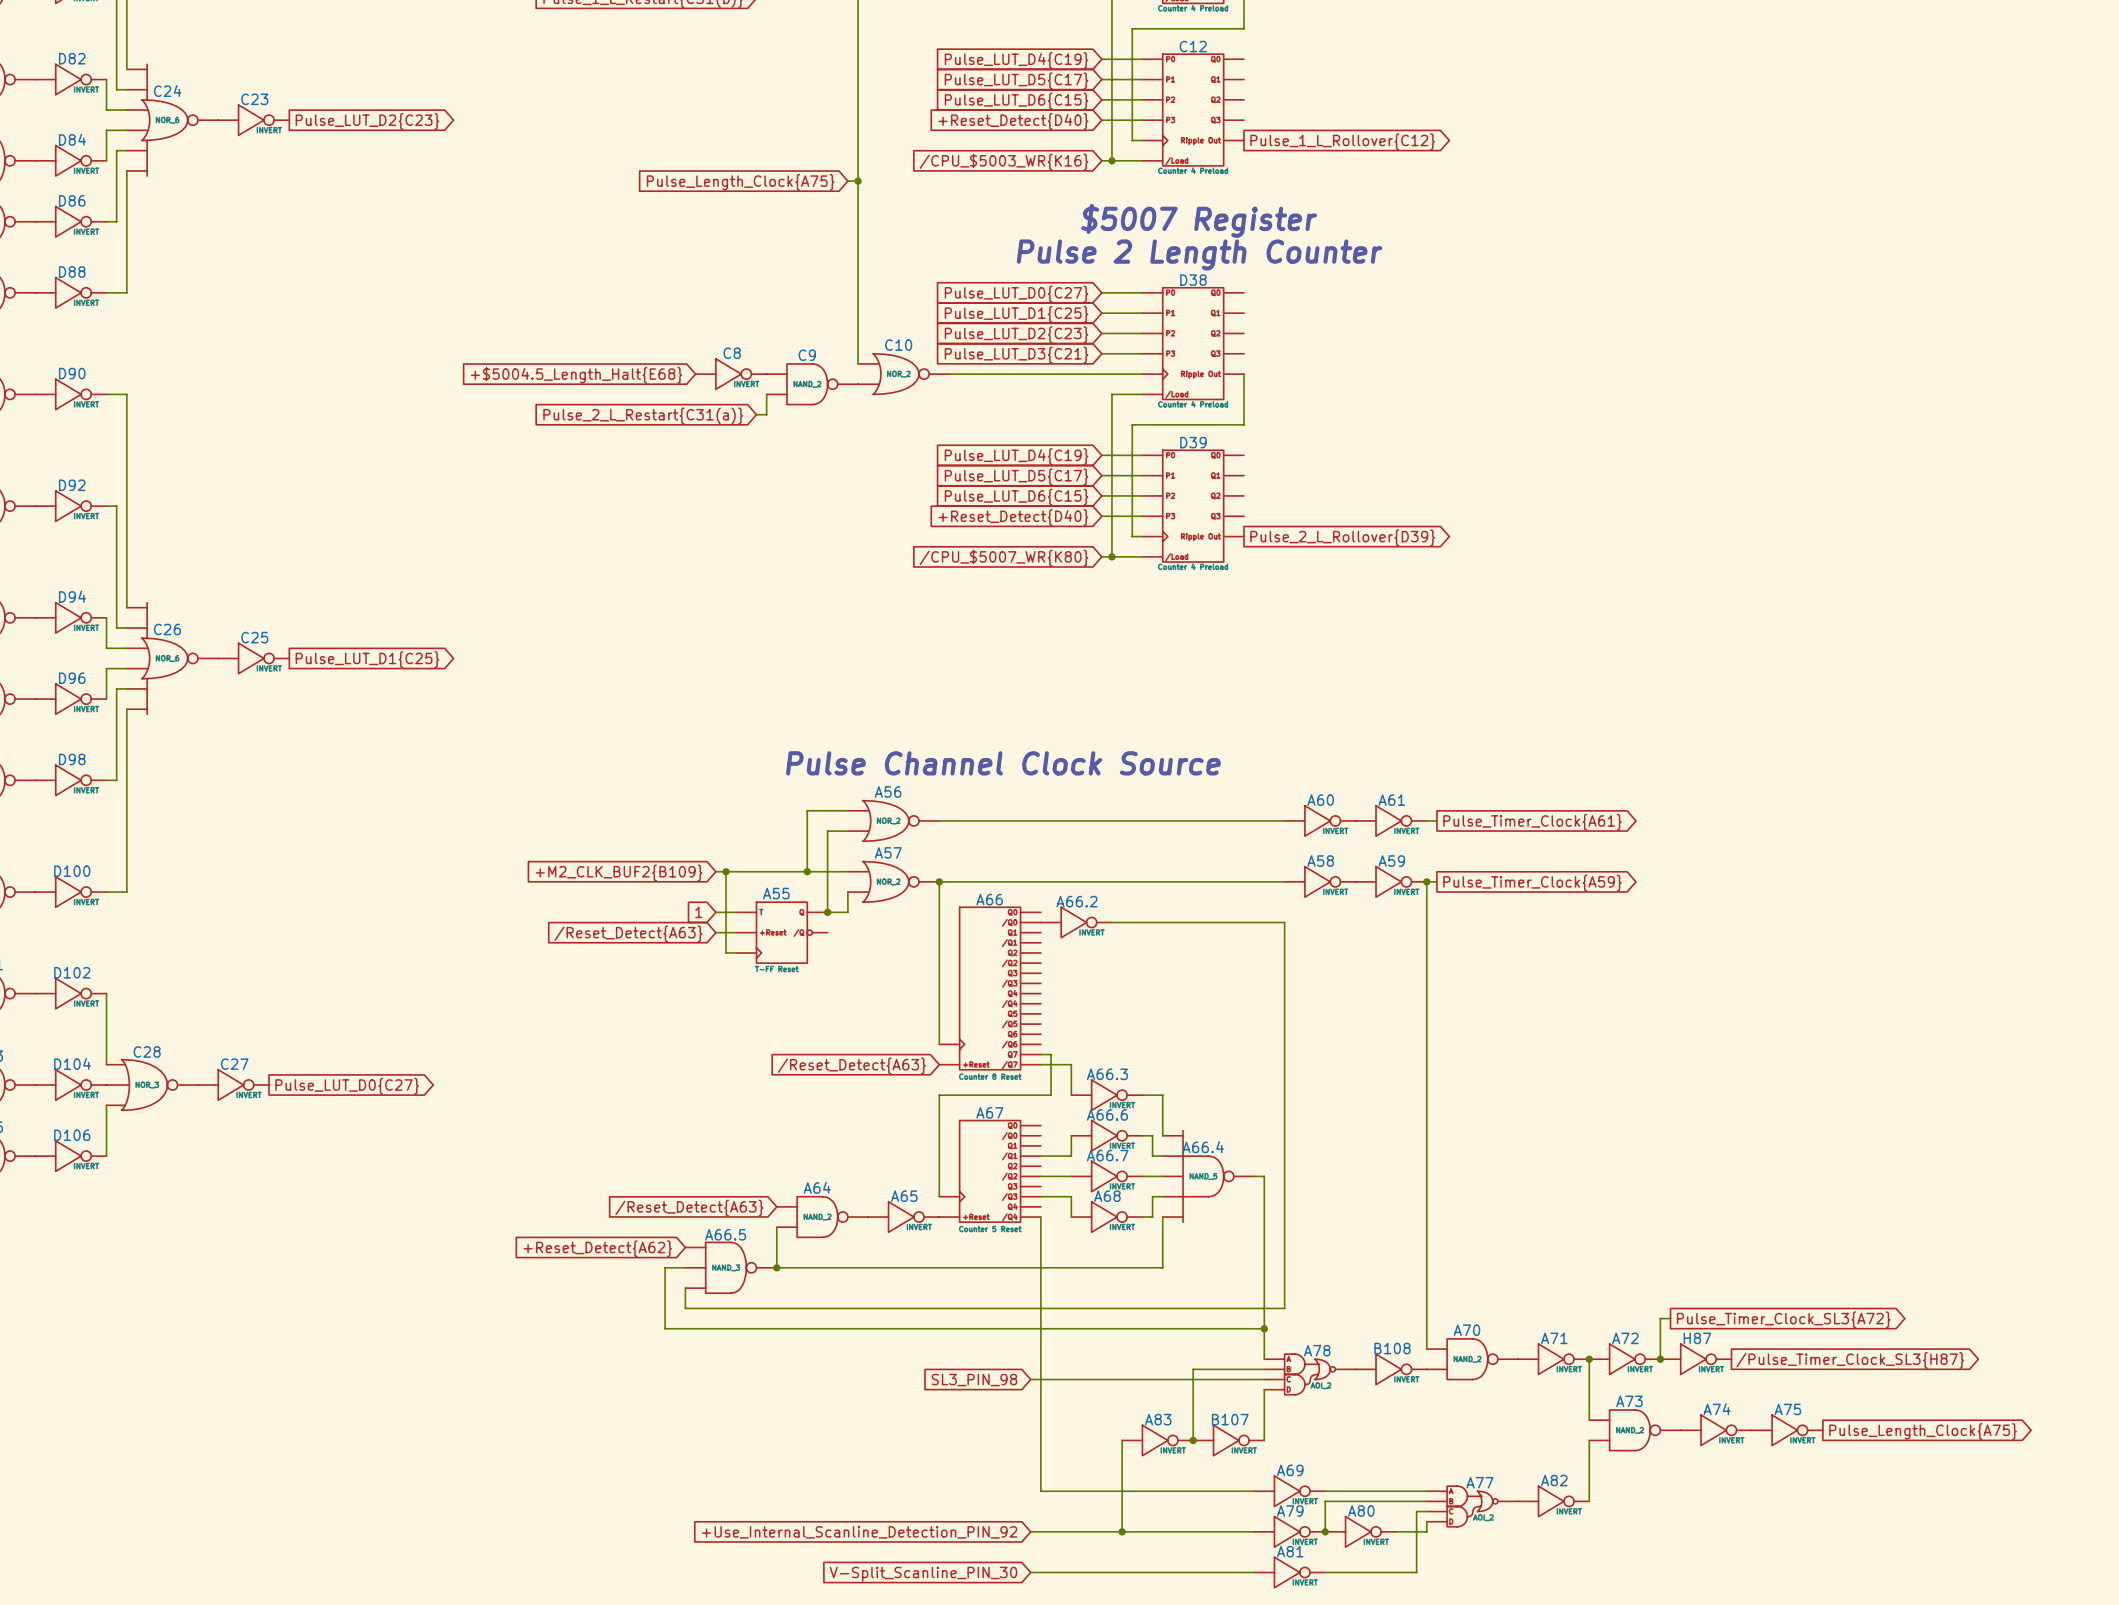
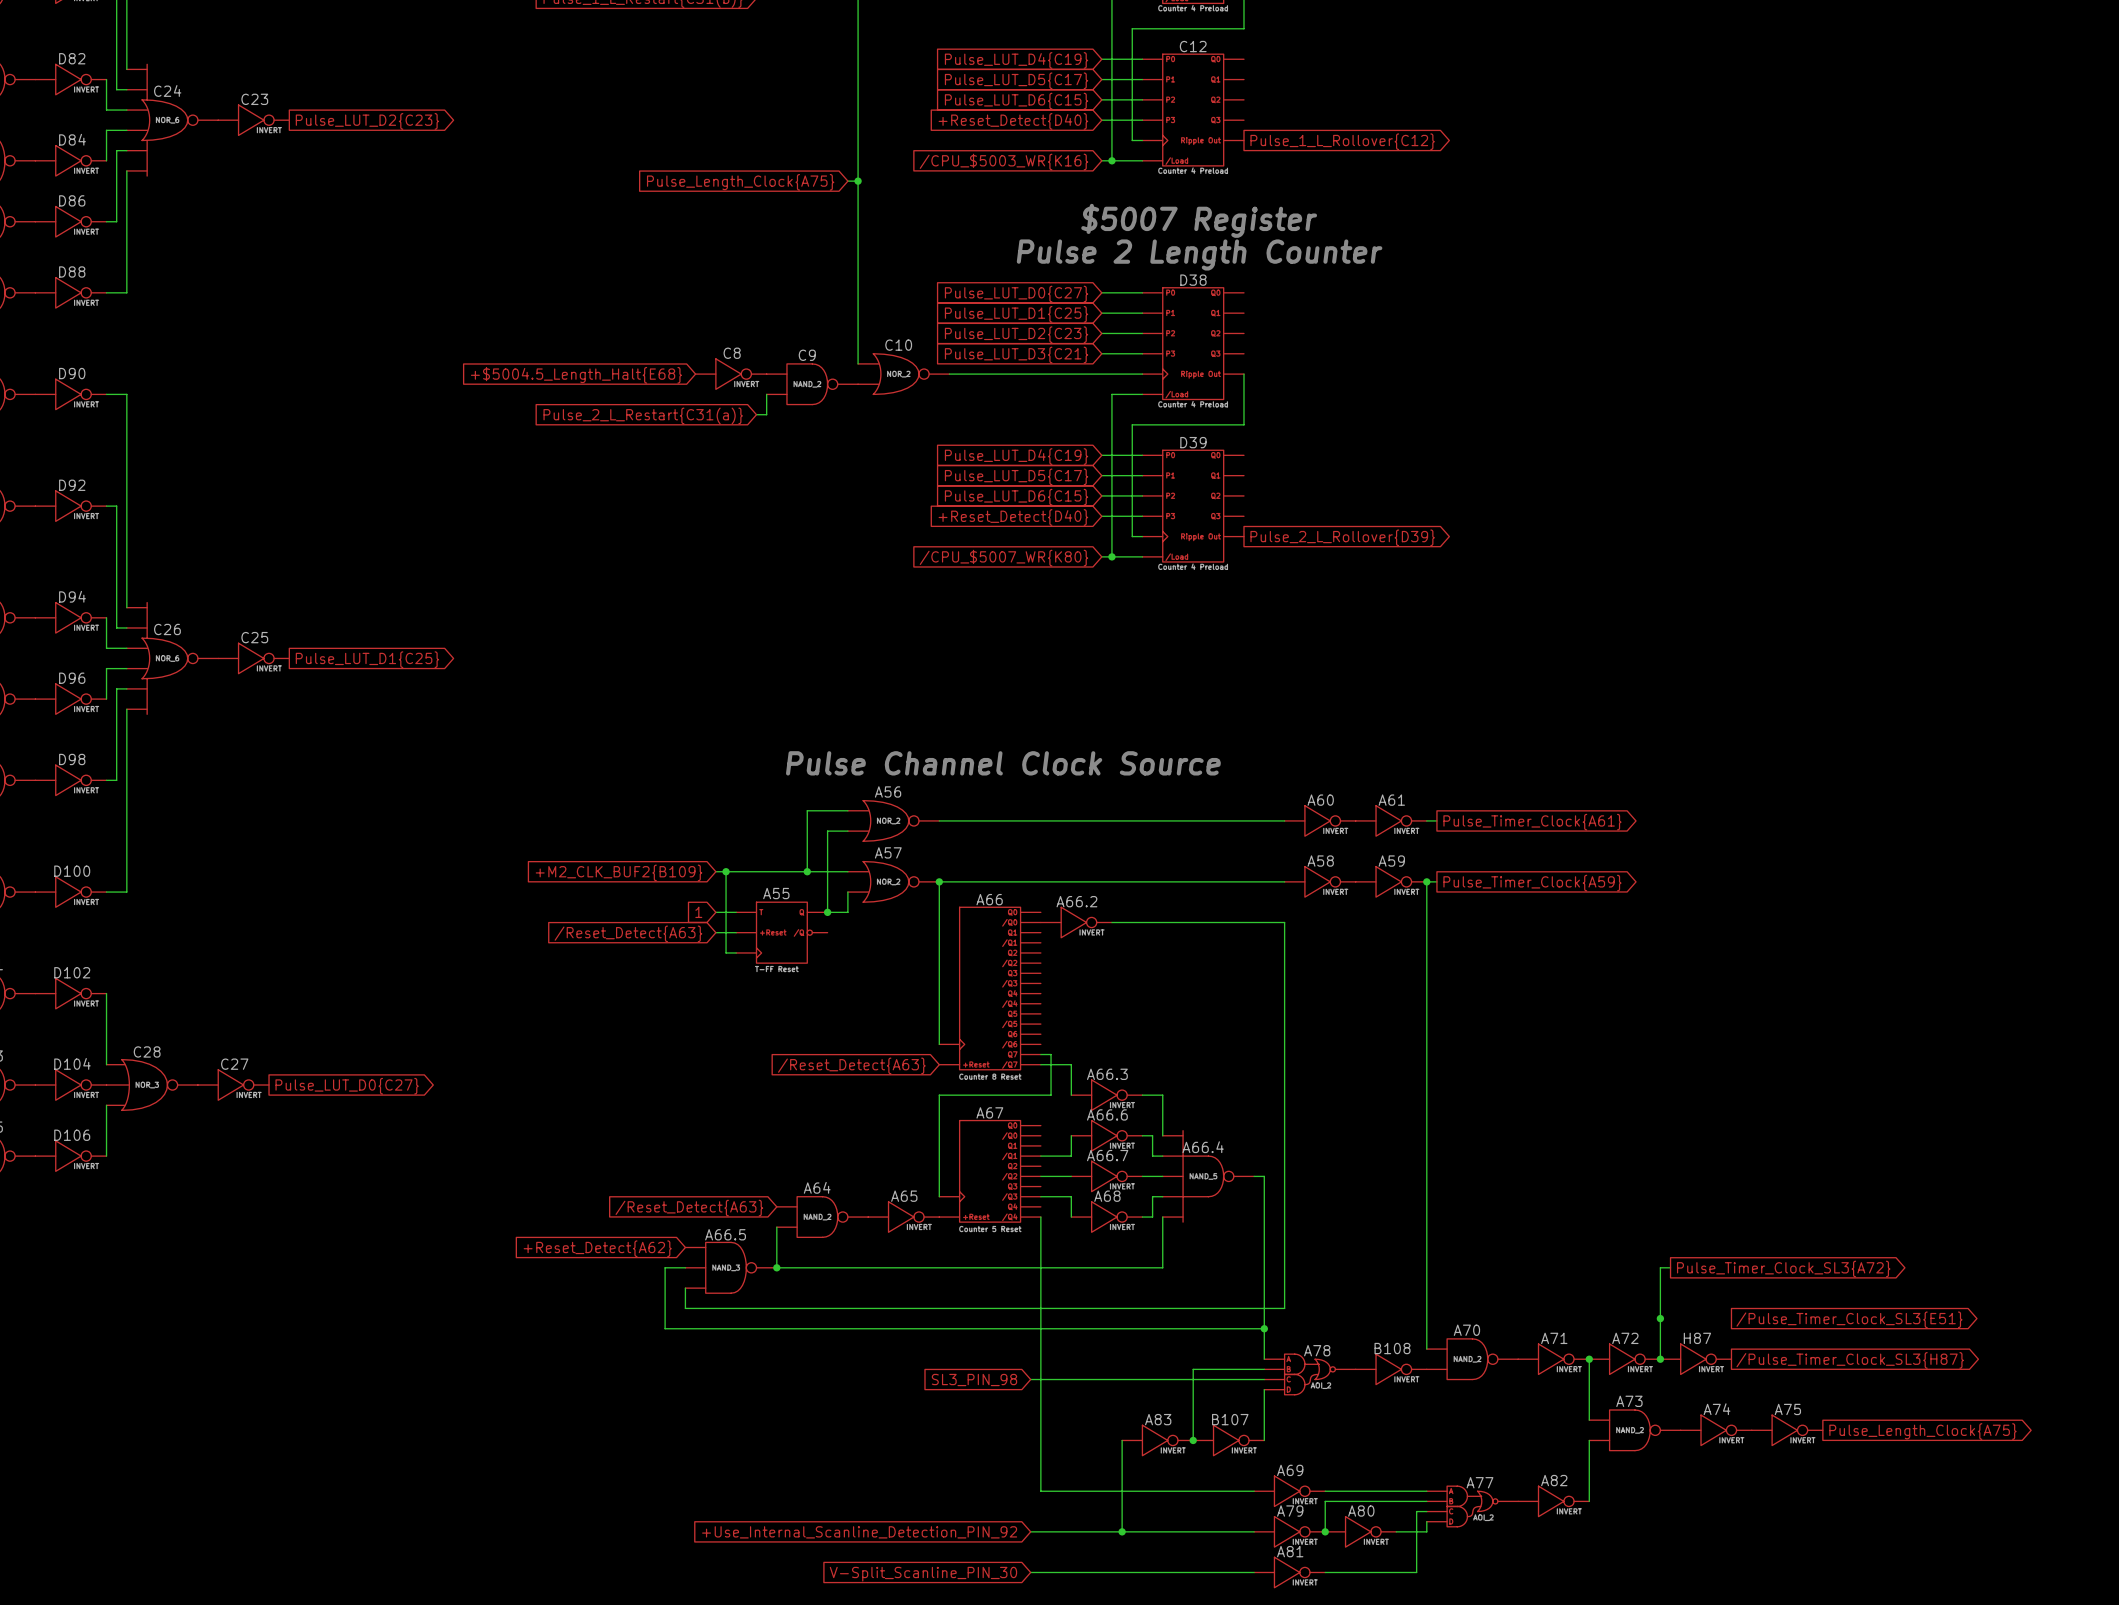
wire: (1660, 1318) (1670, 1318) -> (1660, 1318) (1660, 1267) (1670, 1267)
junction: none -> (1660, 1318)
global label position: Pulse_Timer_Clock_SL3{A72} (1783, 1319) -> Pulse_Timer_Clock_SL3{A72} (1783, 1269)
global label: none -> /Pulse_Timer_Clock_SL3{E51} (1849, 1319)

